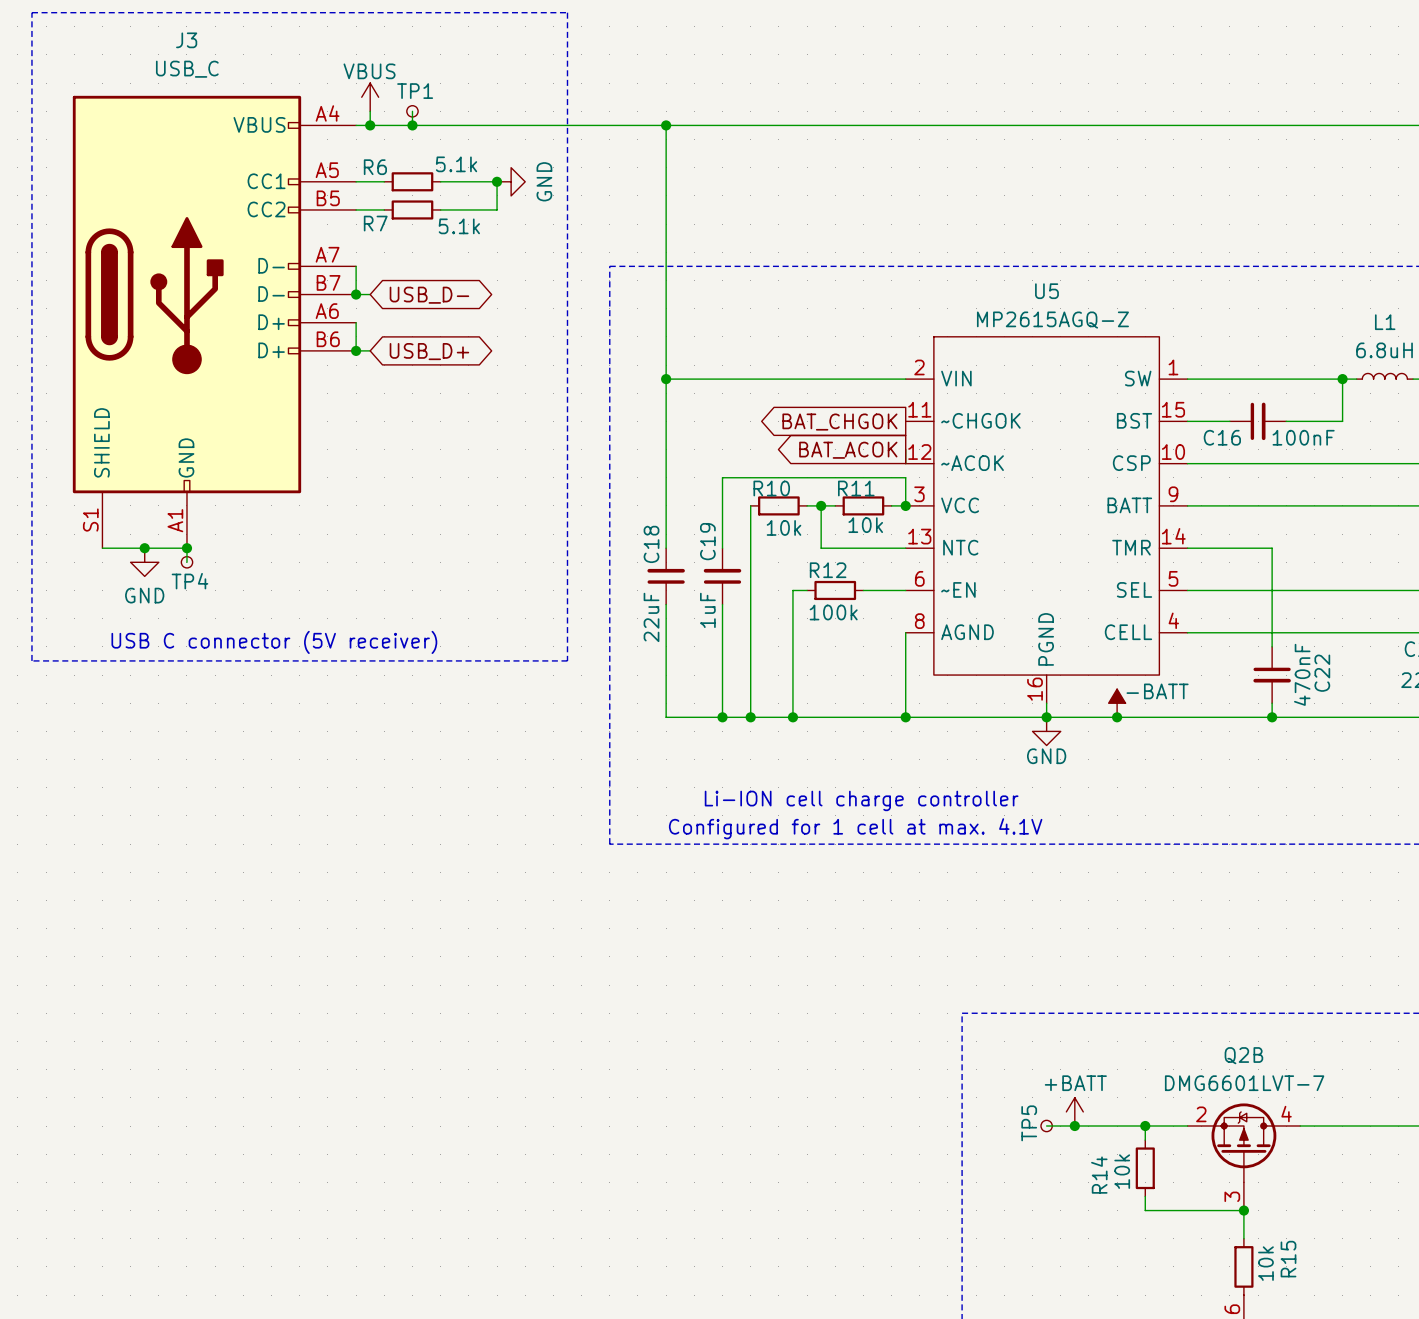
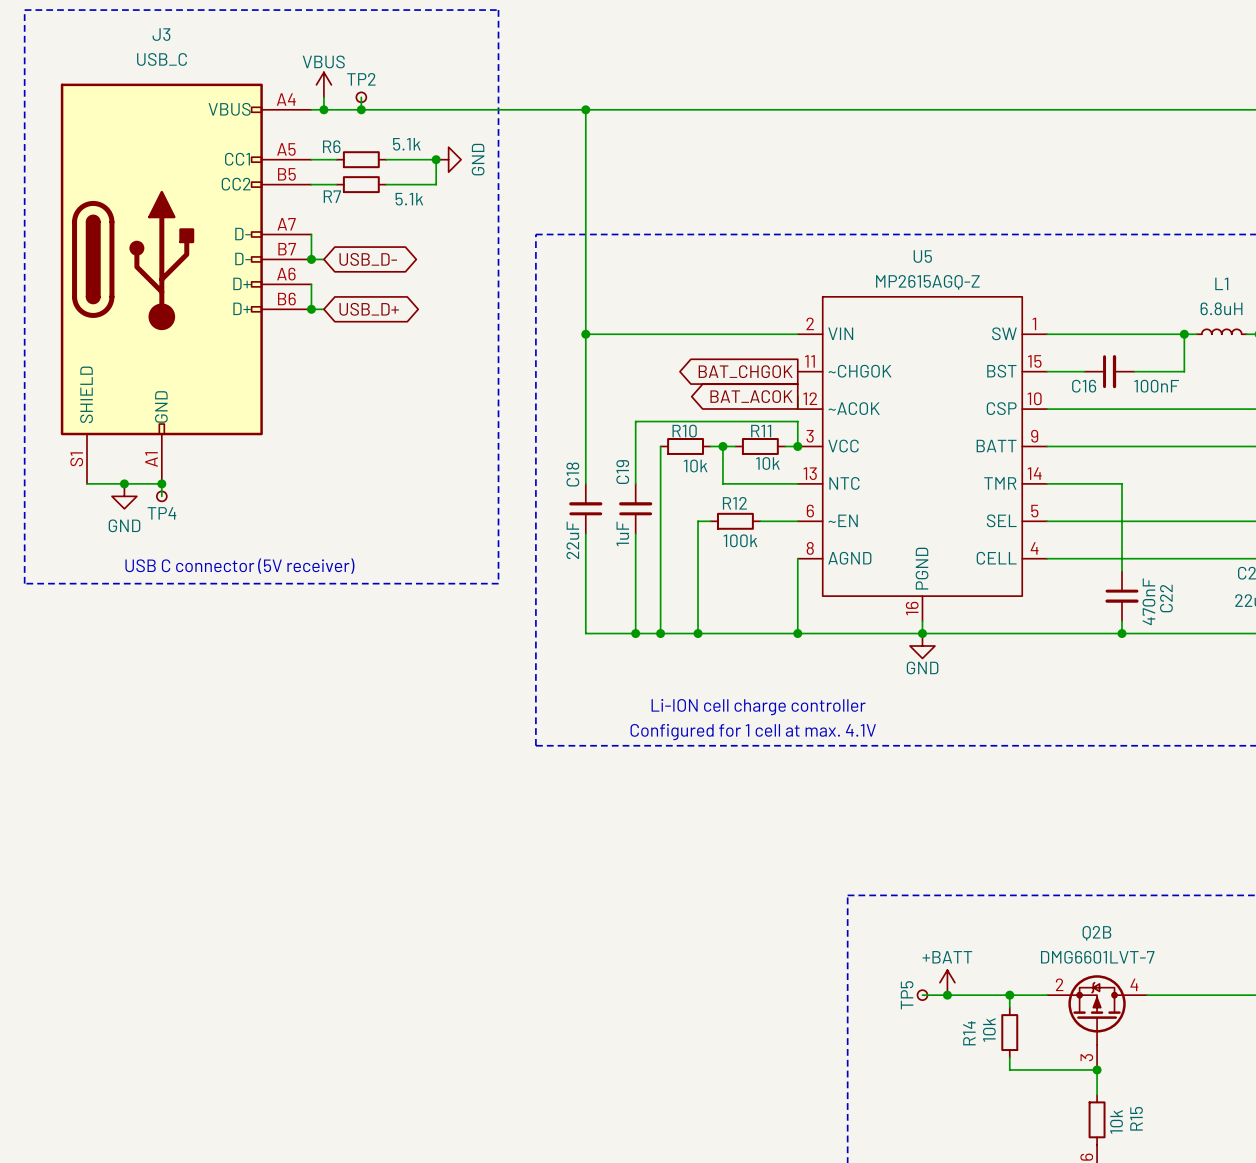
TP1 name: TP1 (415, 91) -> TP2 (361, 79)
power symbol: -BATT (1117, 703) -> none
junction: (1117, 717) -> none

